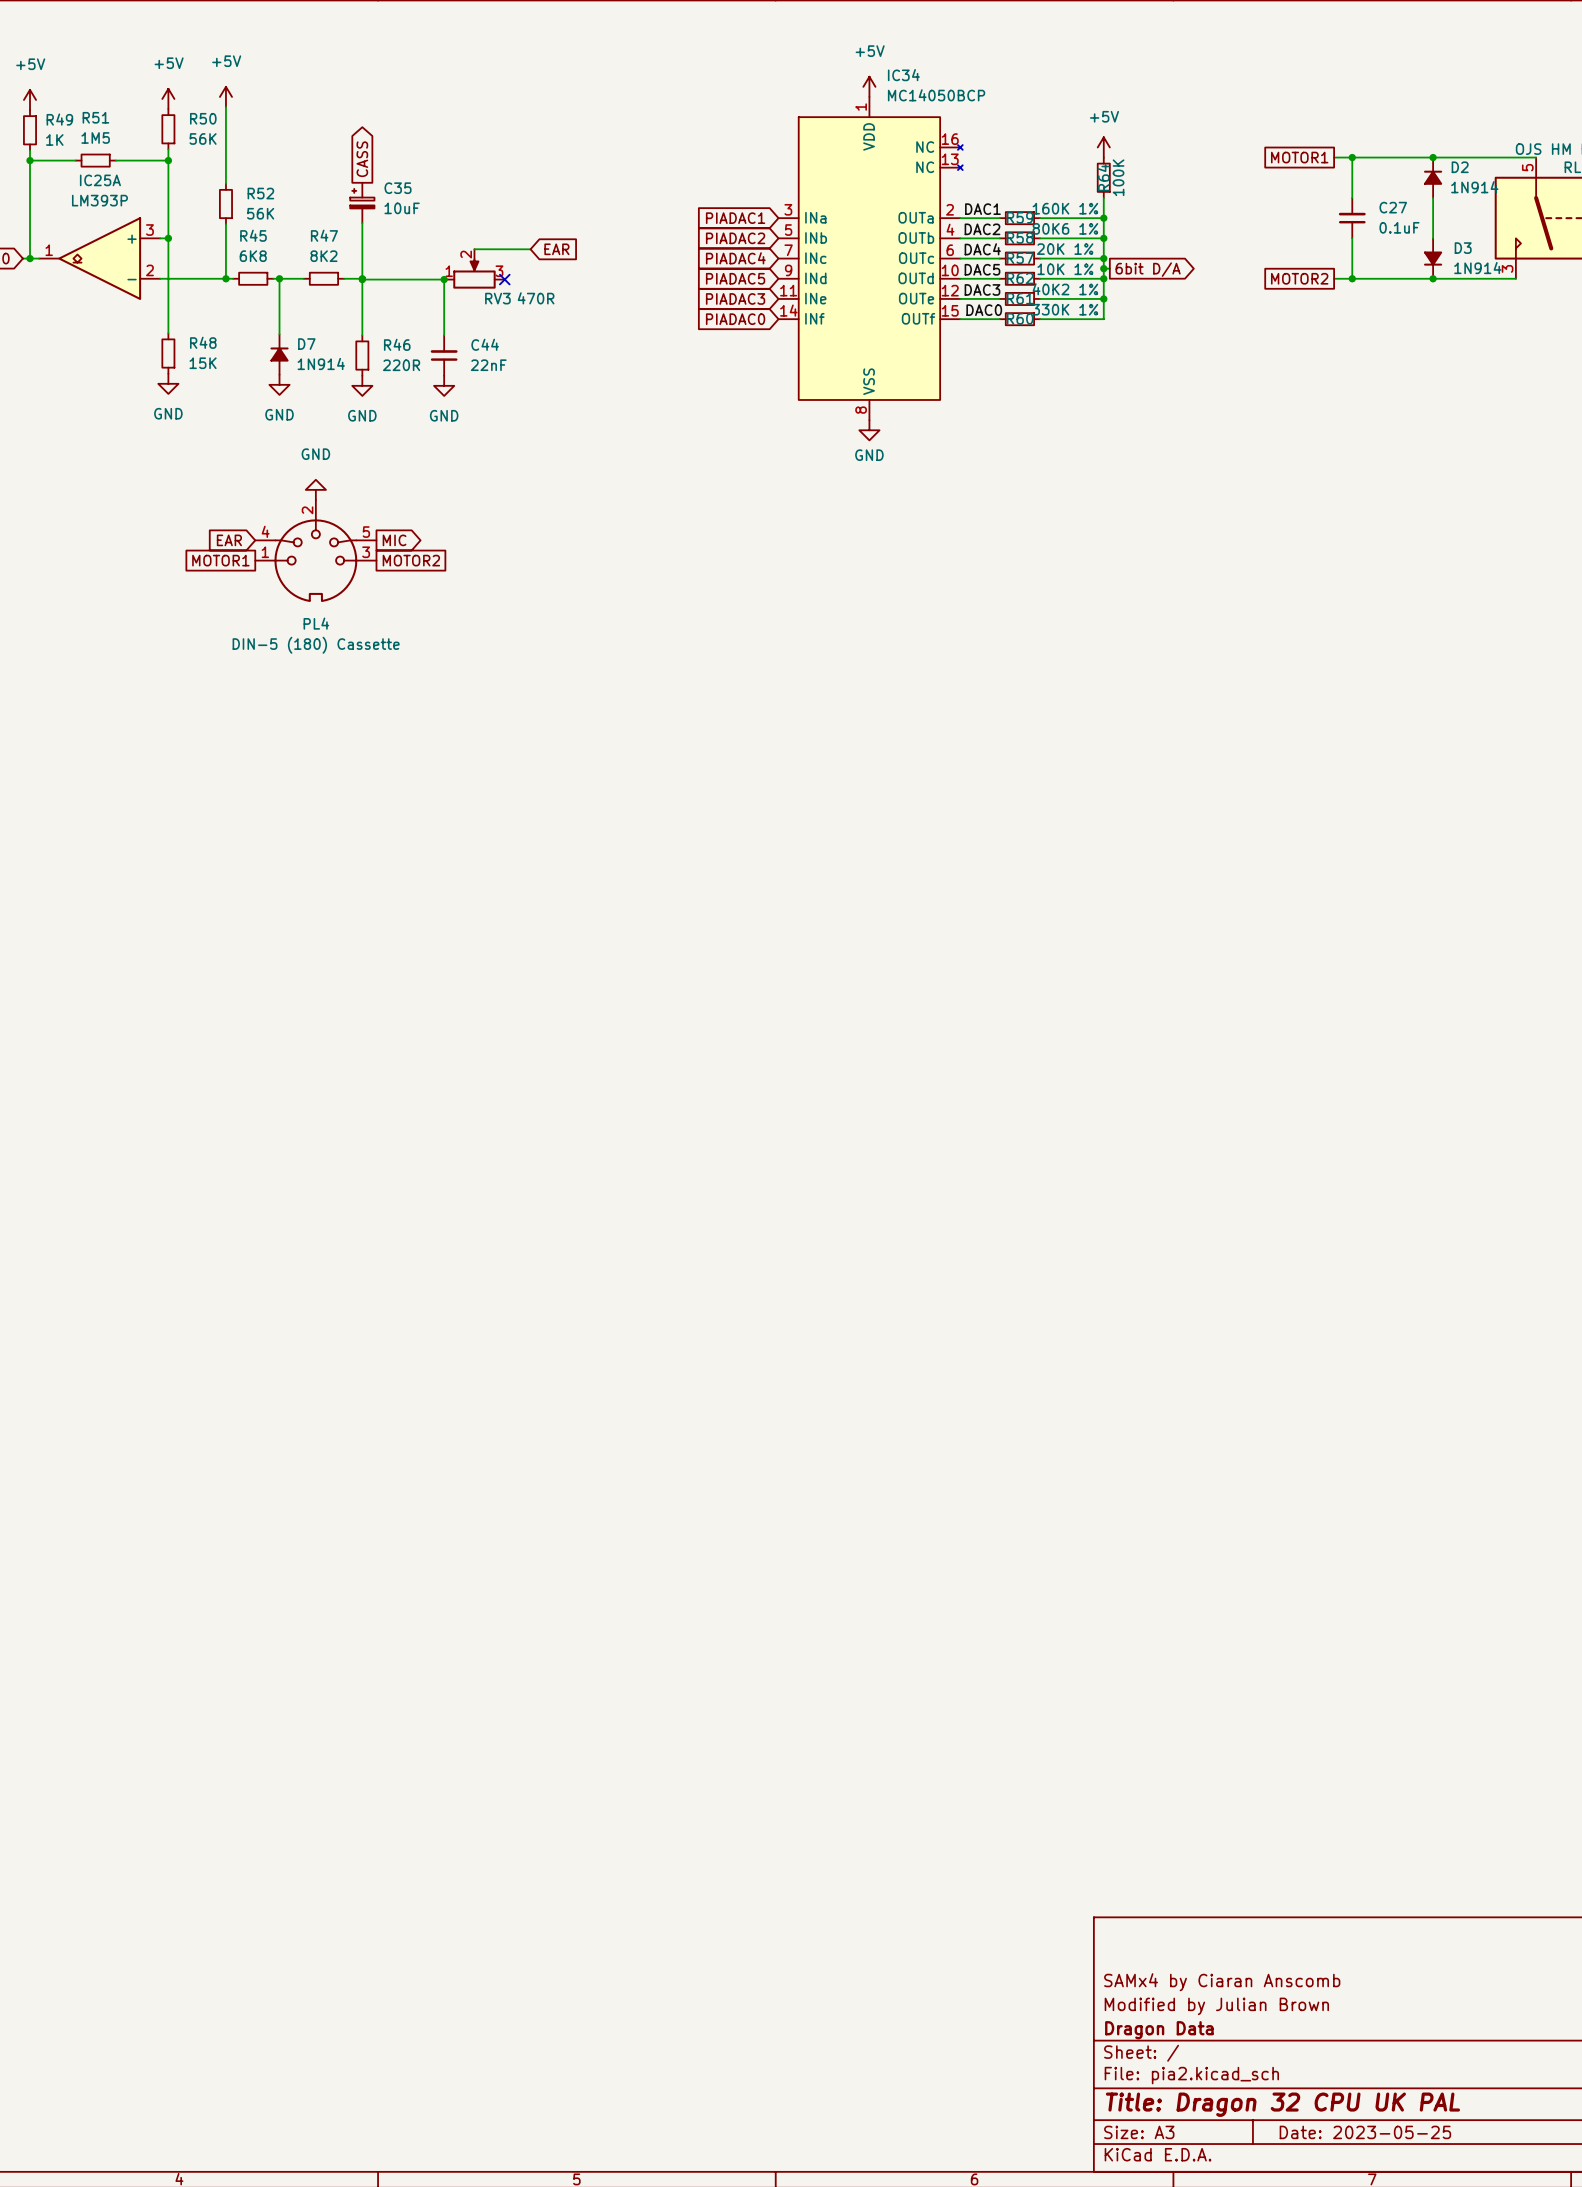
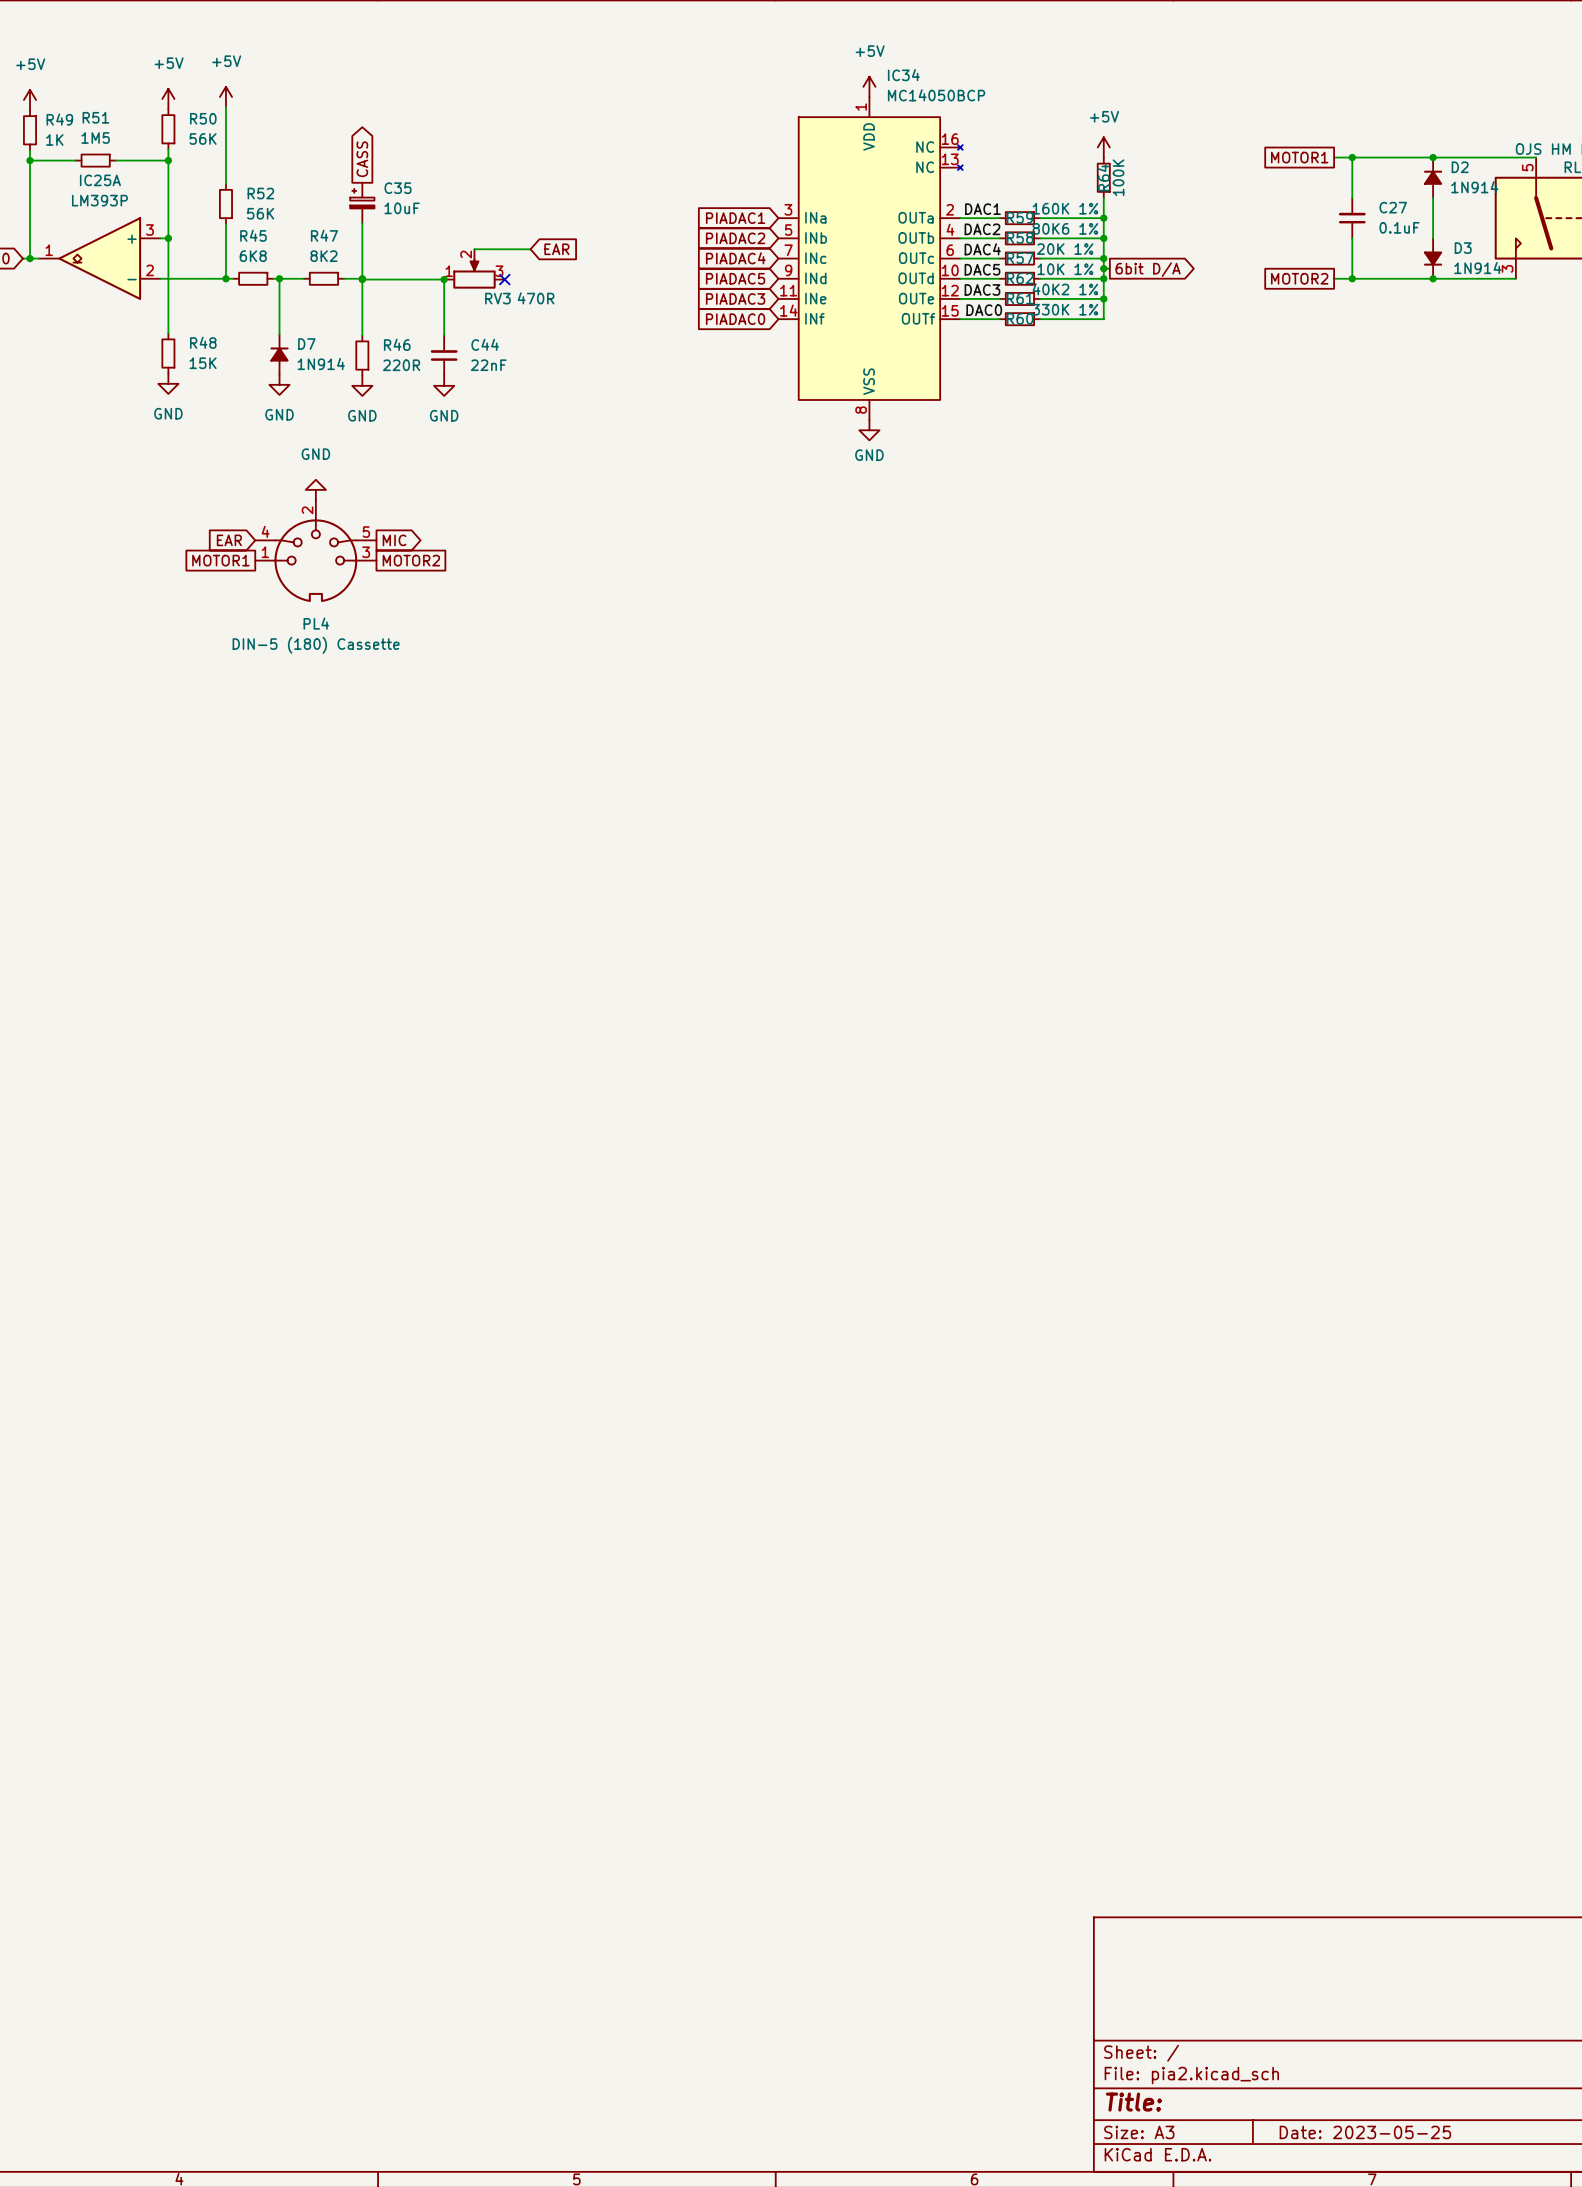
title block: SAMx4 by Ciaran Anscomb (1222, 1982) -> none
title block: Modified by Julian Brown (1216, 2006) -> none
title block: Dragon Data (1159, 2030) -> none
title block: Title: Dragon 32 CPU UK PAL (1282, 2104) -> Title: (1133, 2102)

